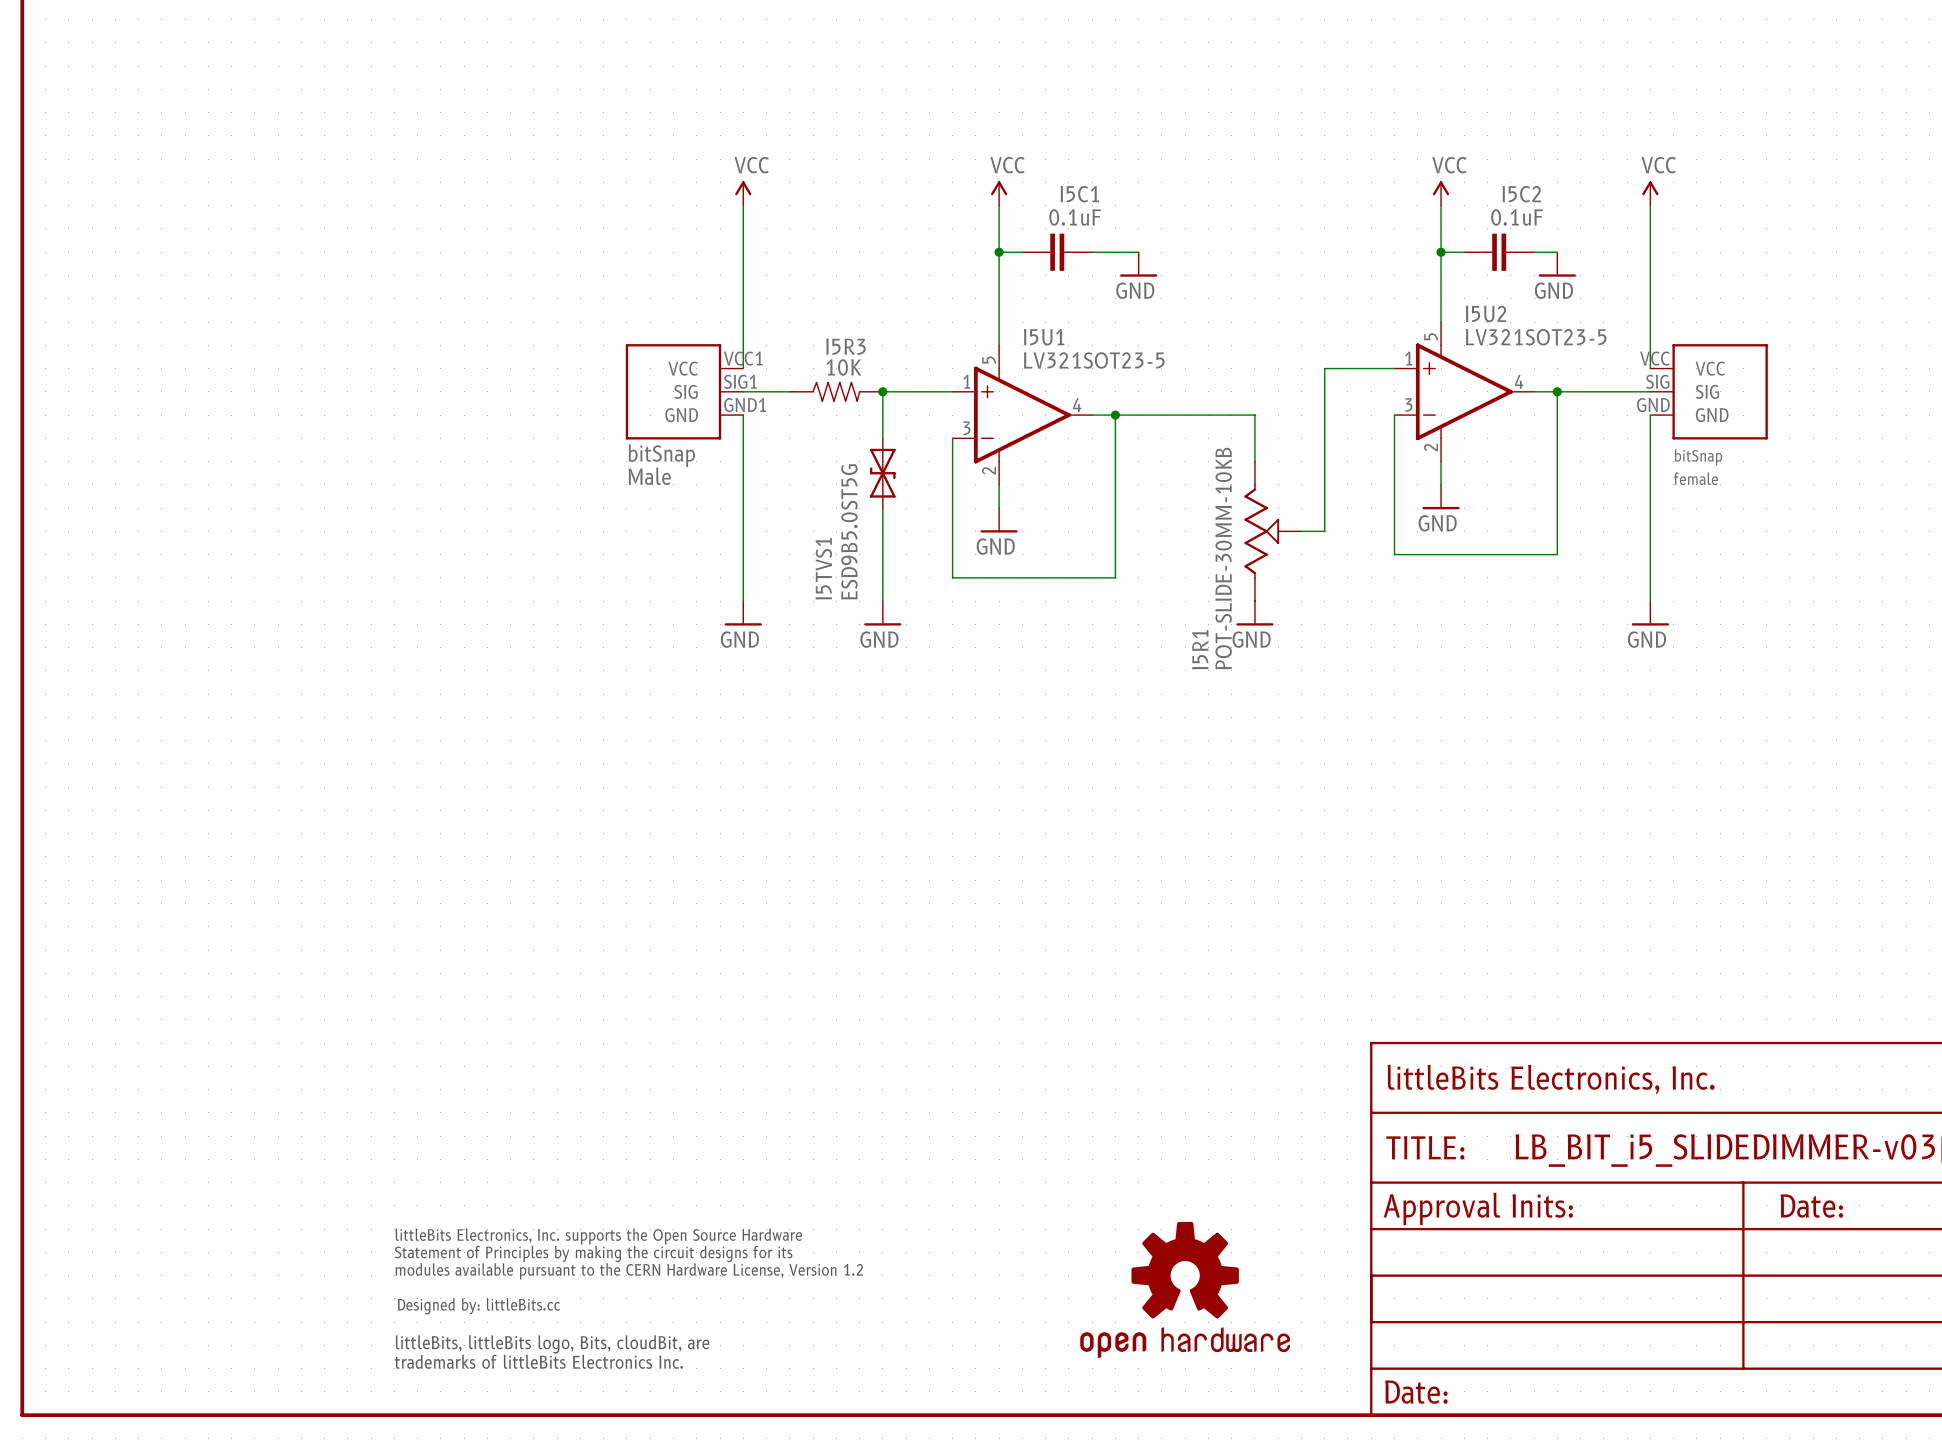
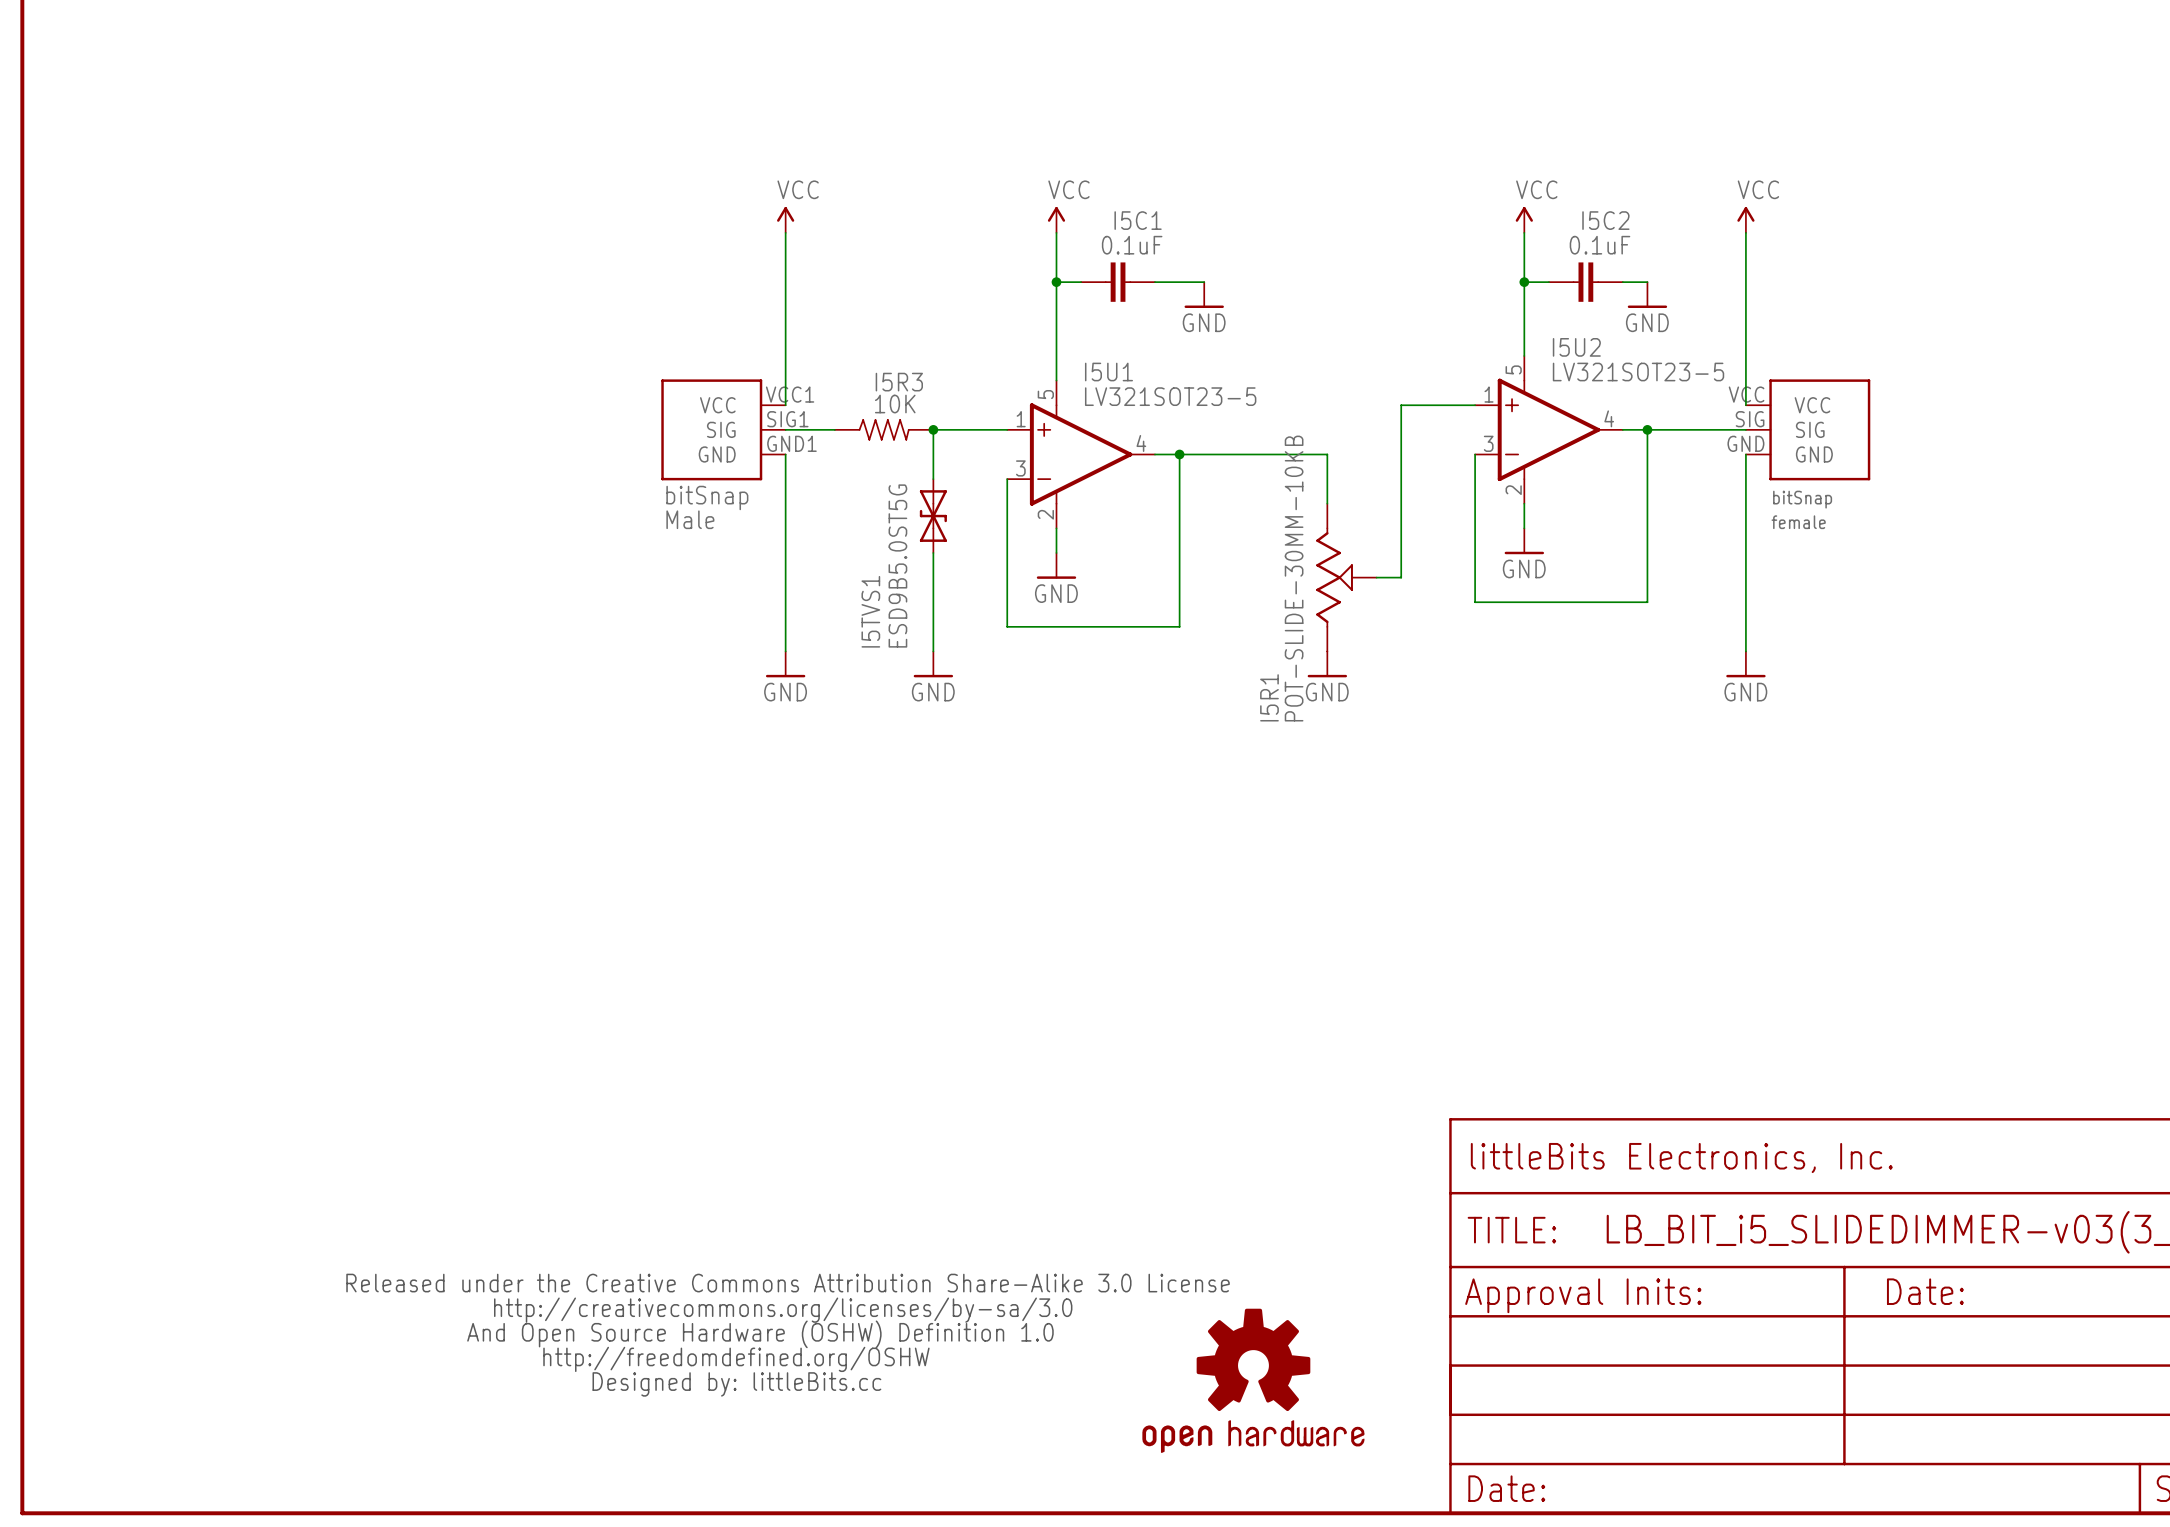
part: none -> (788, 1335)
part: (628, 1298) -> none

